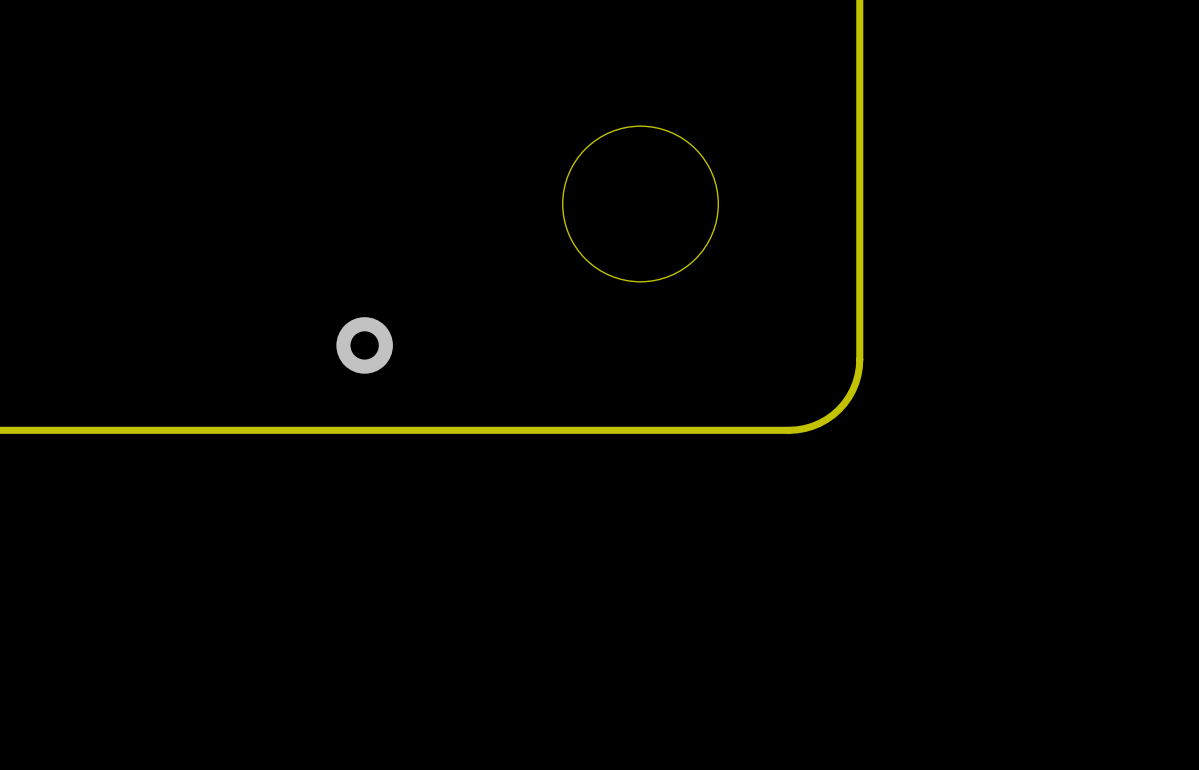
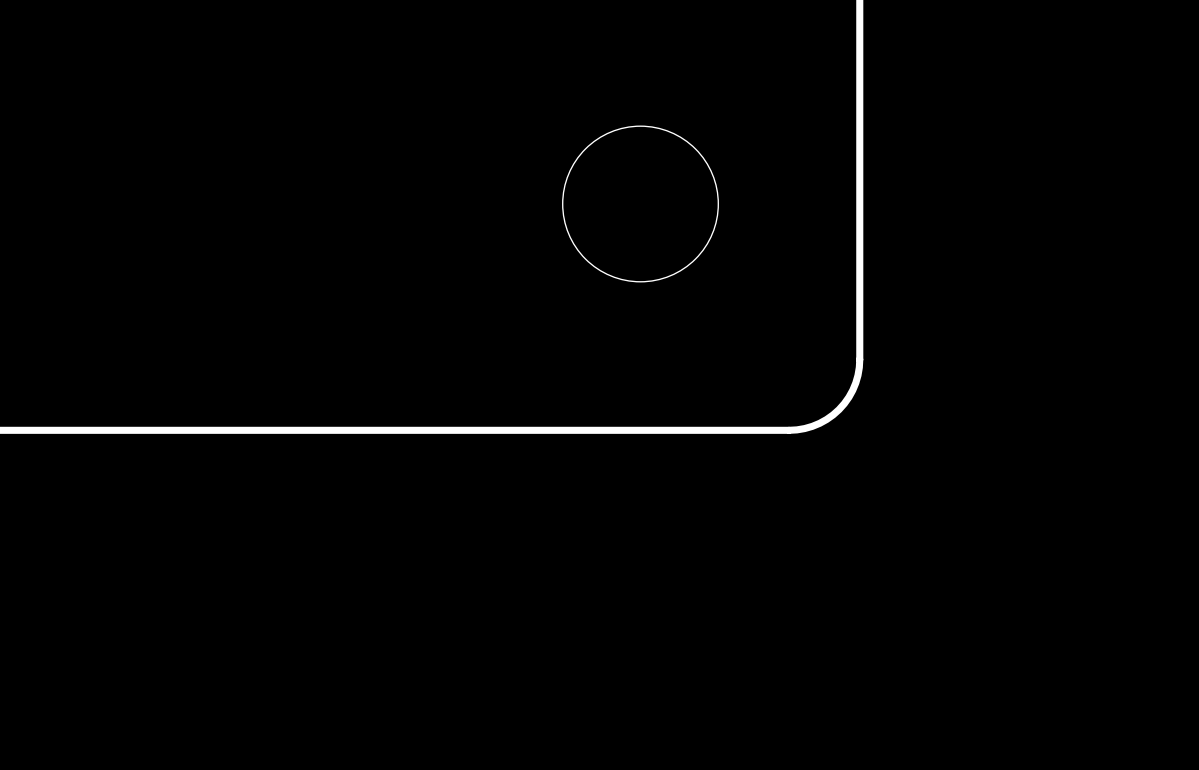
via: (364, 345) -> none

